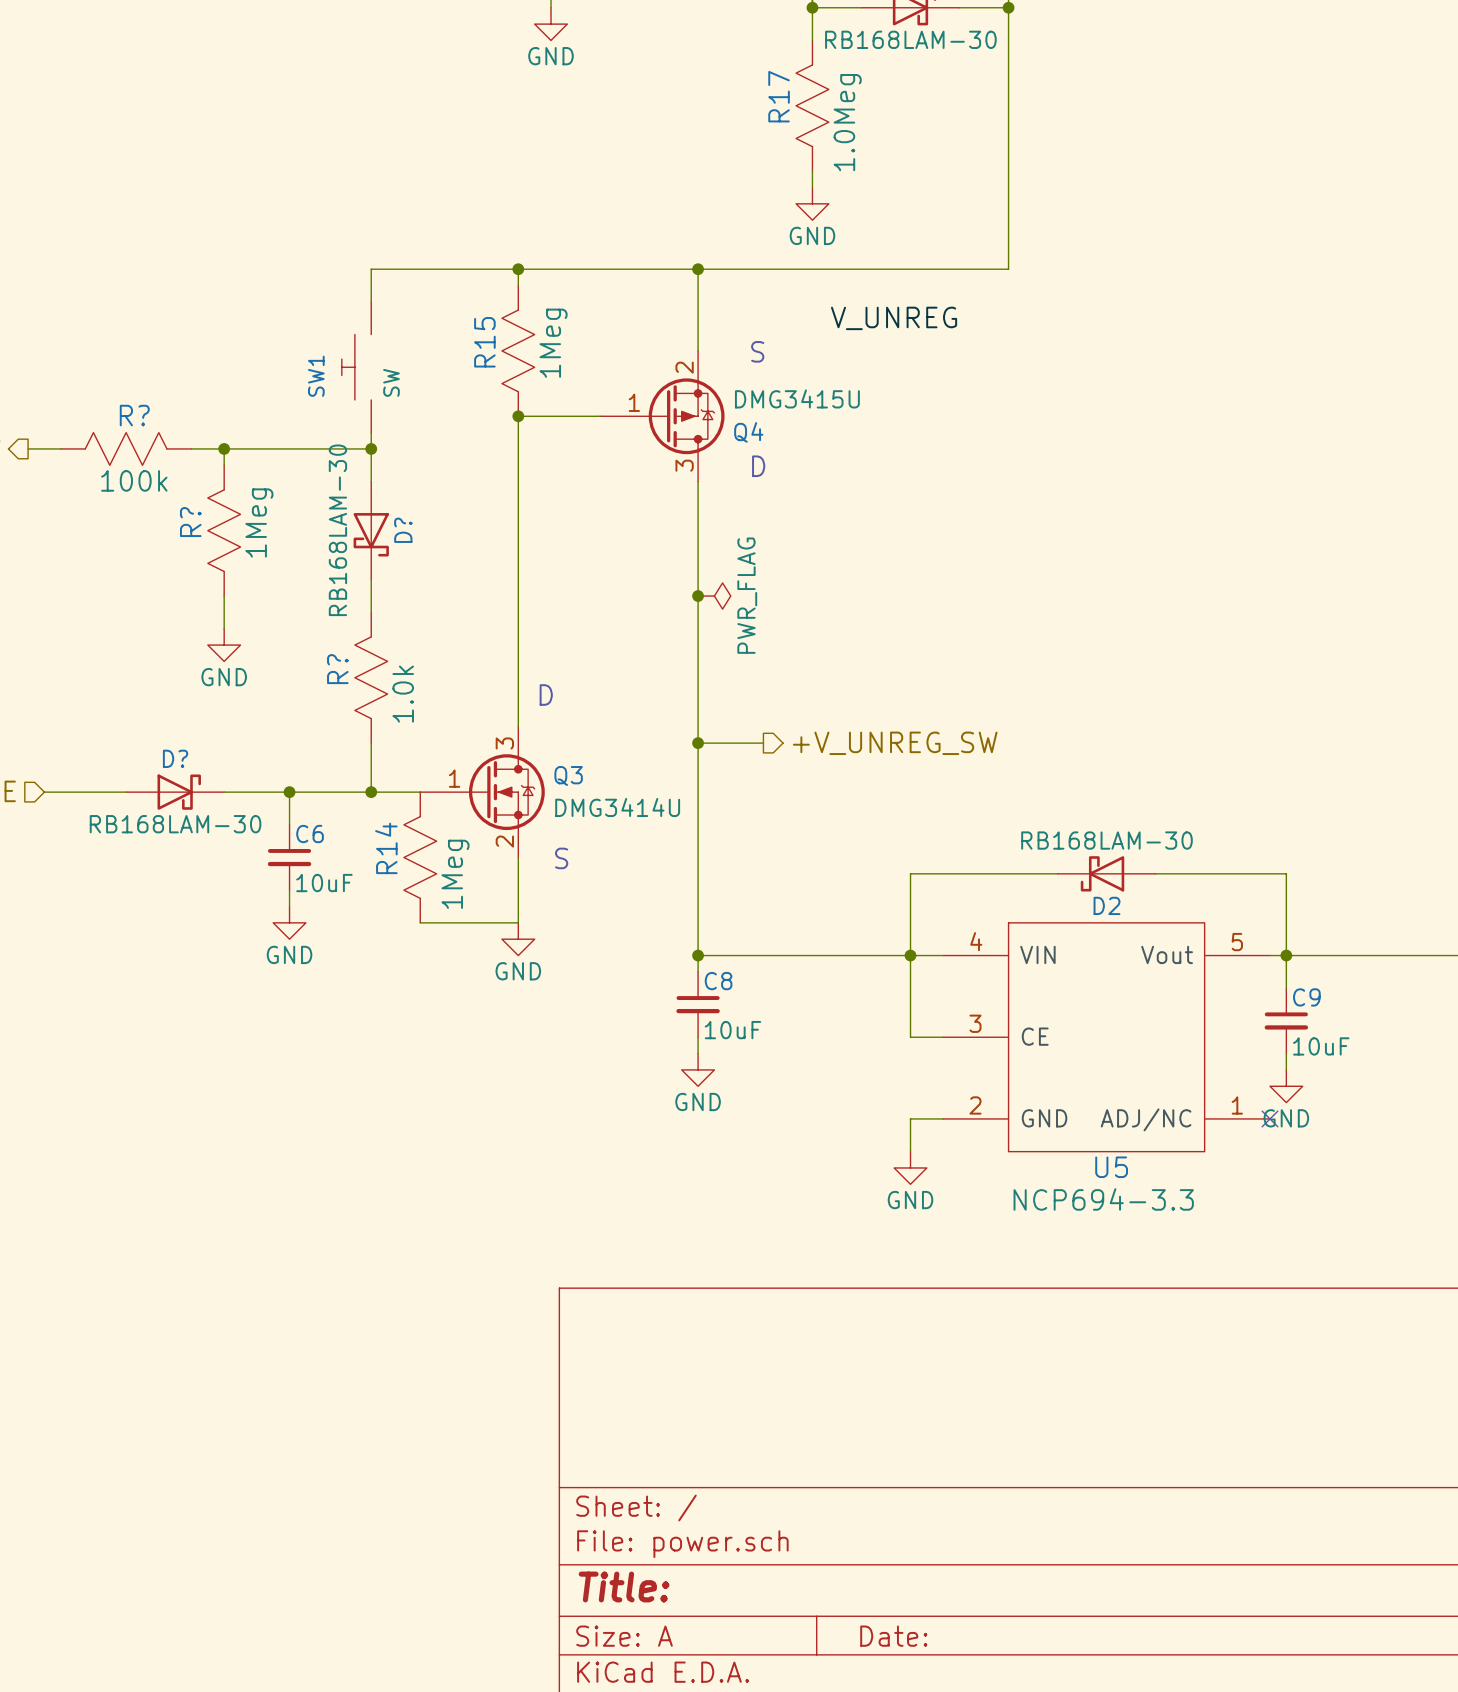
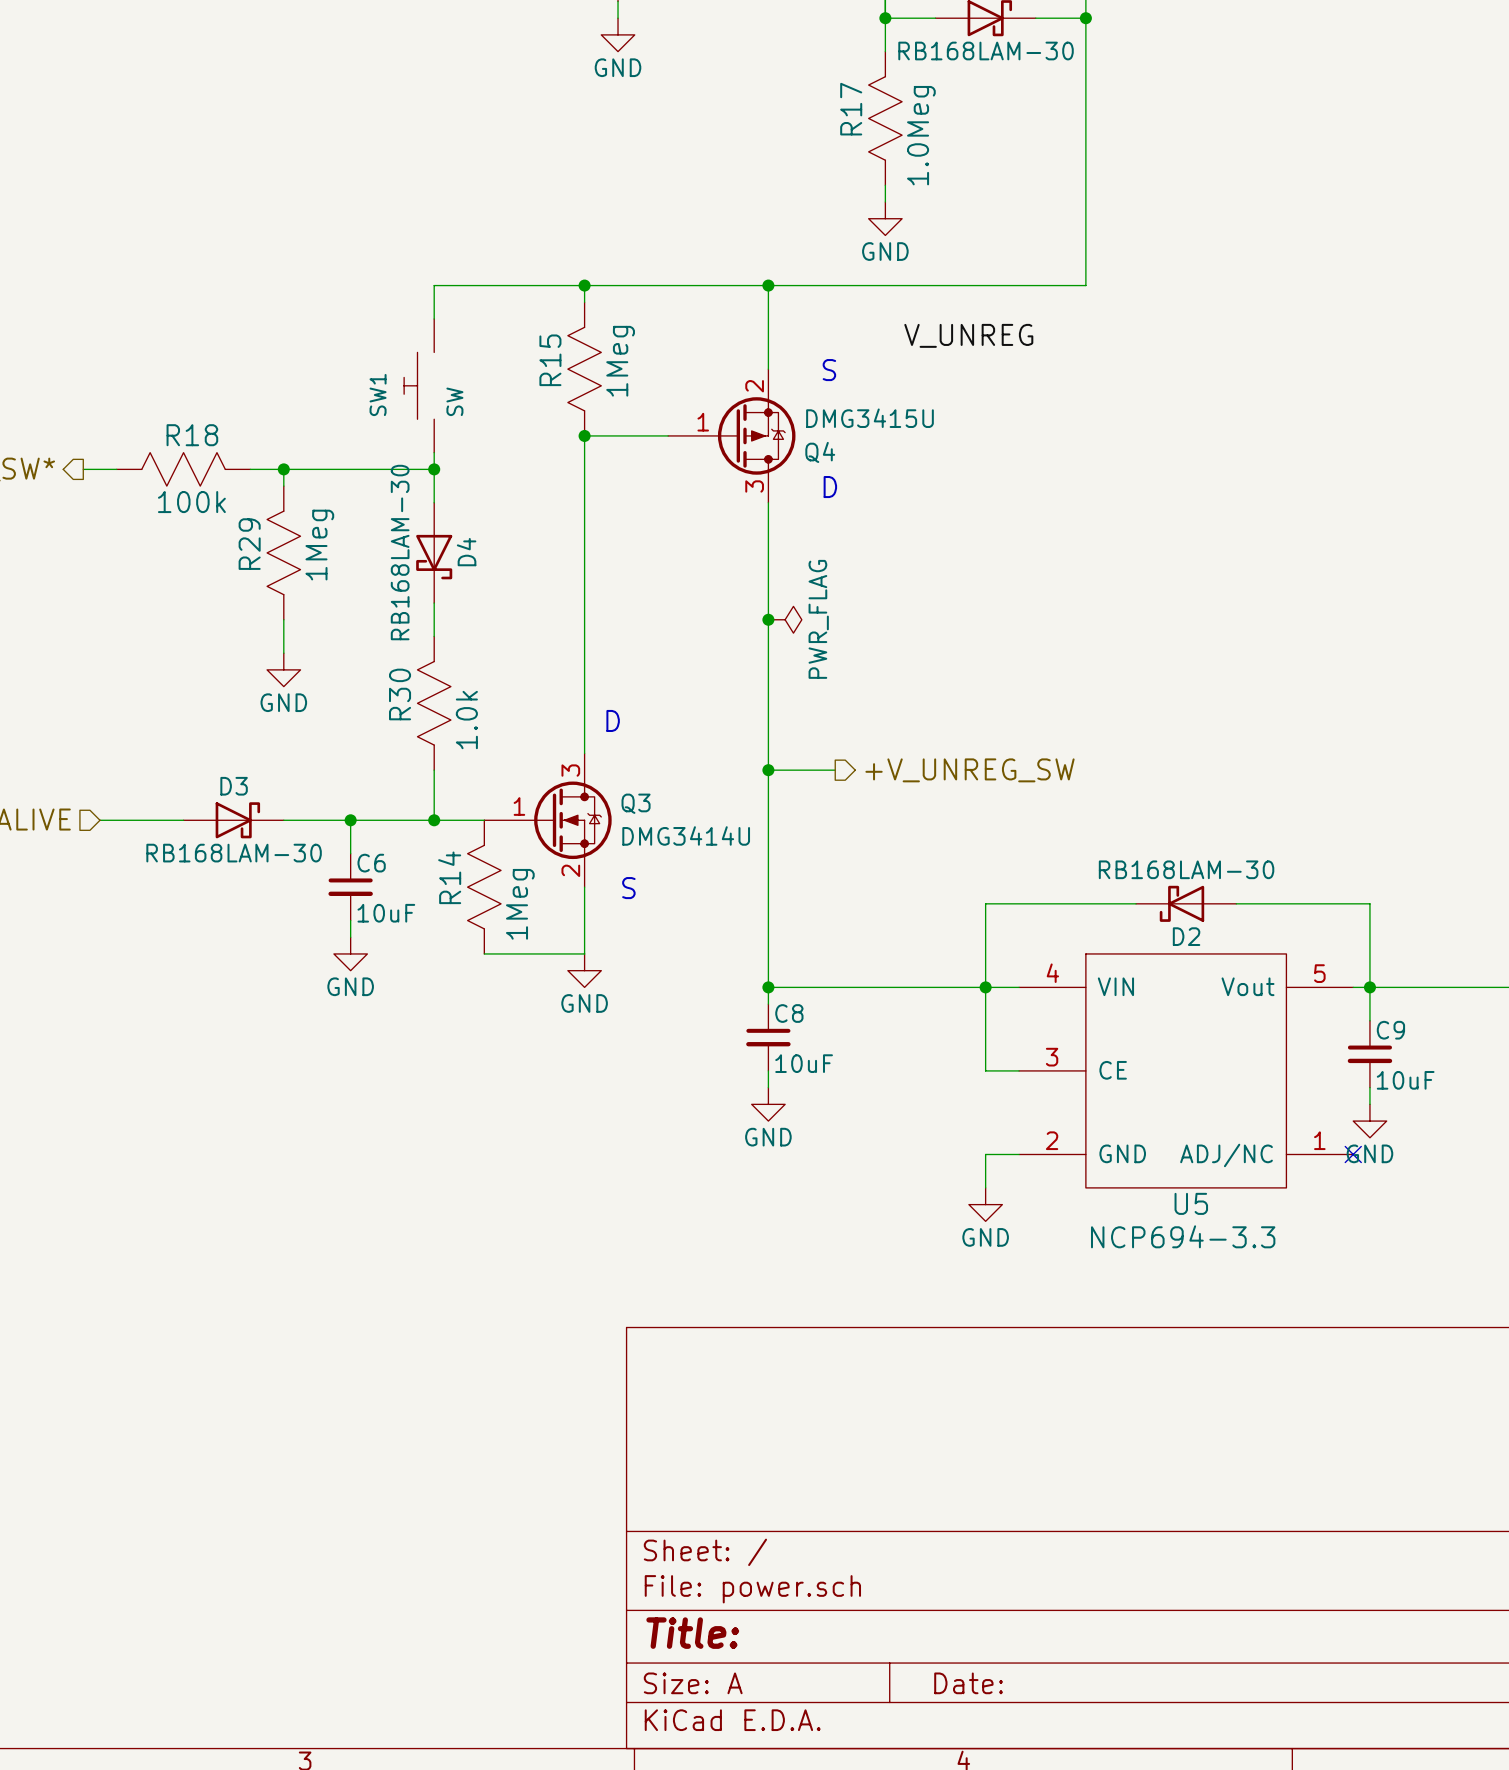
R? name: R? (134, 415) -> R18 (192, 435)
R? name: R? (190, 522) -> R29 (249, 544)
D? name: D? (403, 530) -> D4 (466, 552)
R? name: R? (337, 669) -> R30 (400, 694)
D? name: D? (175, 758) -> D3 (234, 786)

